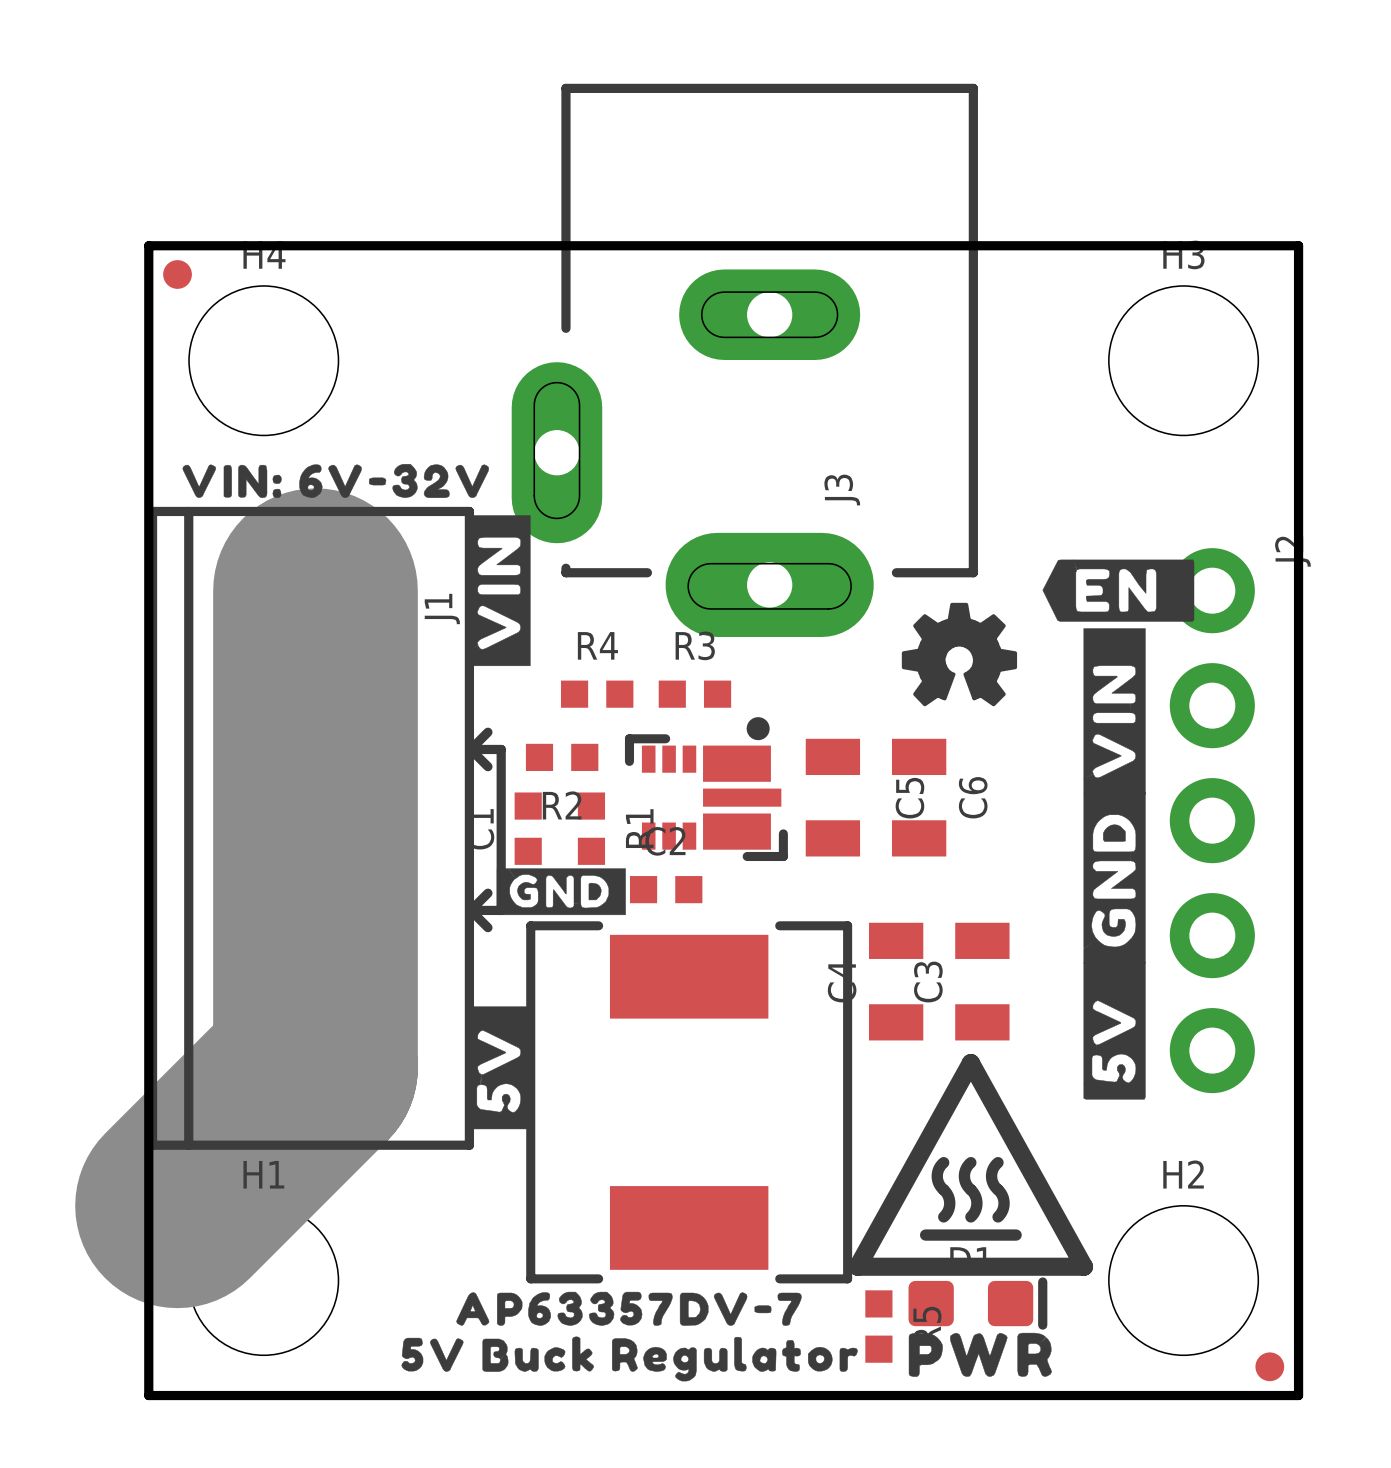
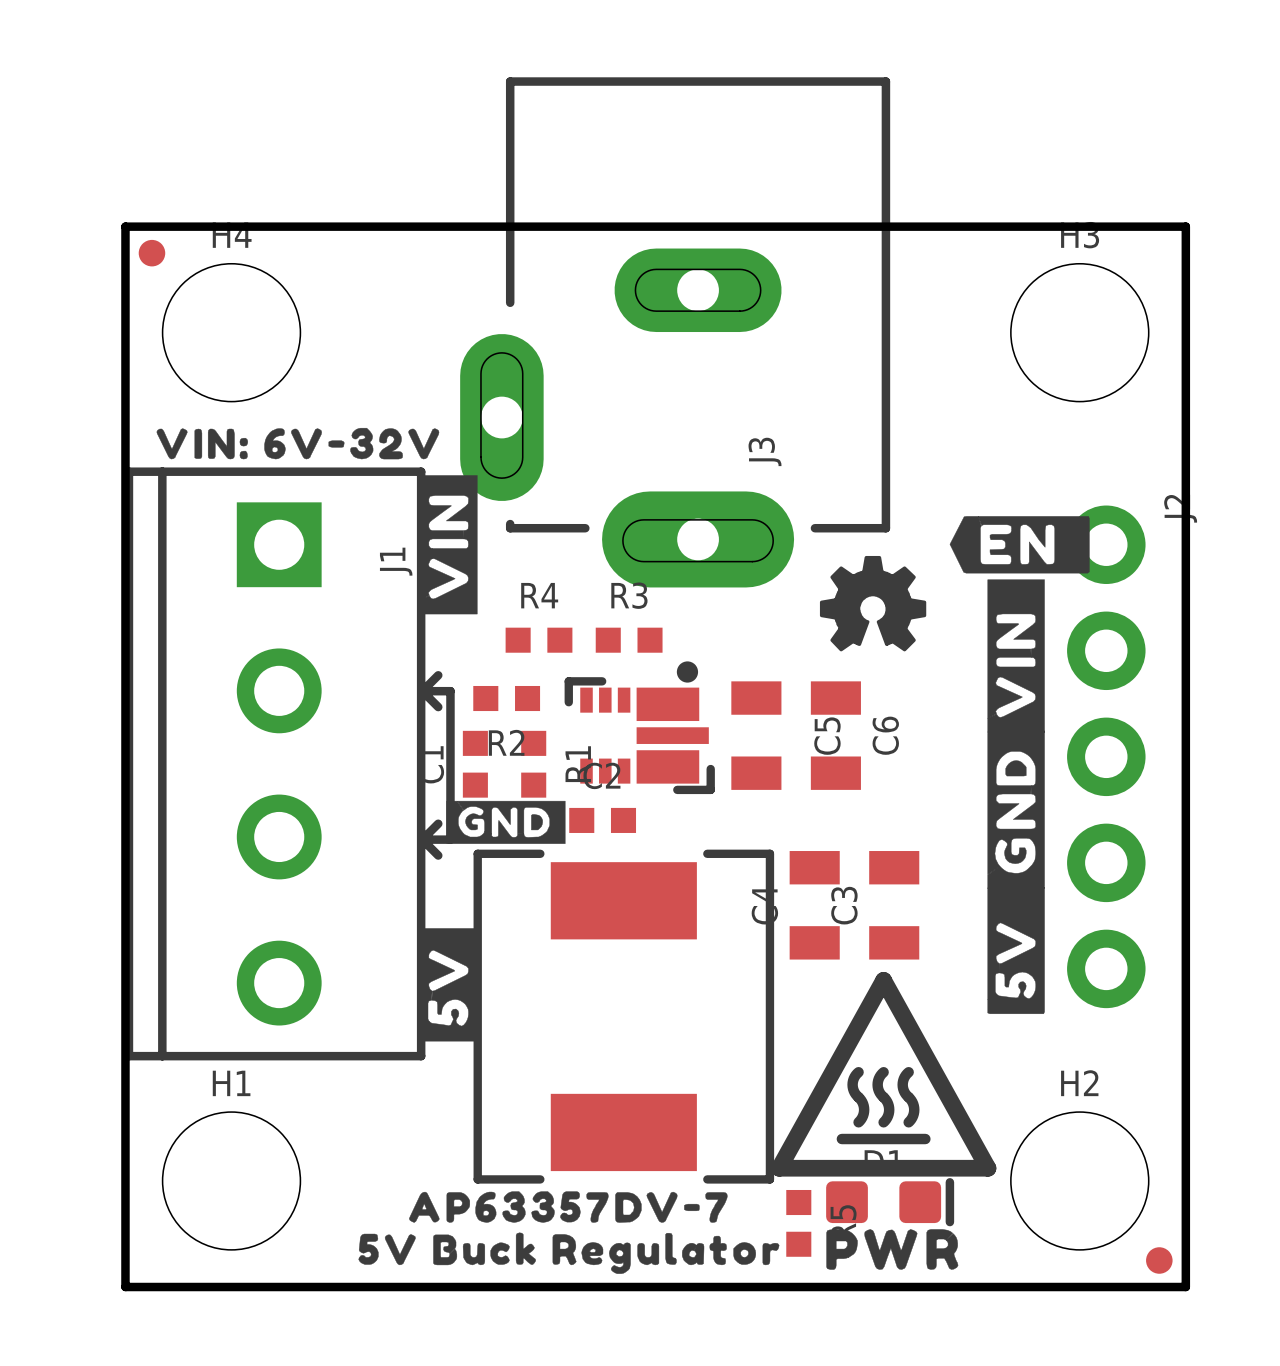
line: (315, 590) (315, 1067) (177, 1205) -> none

